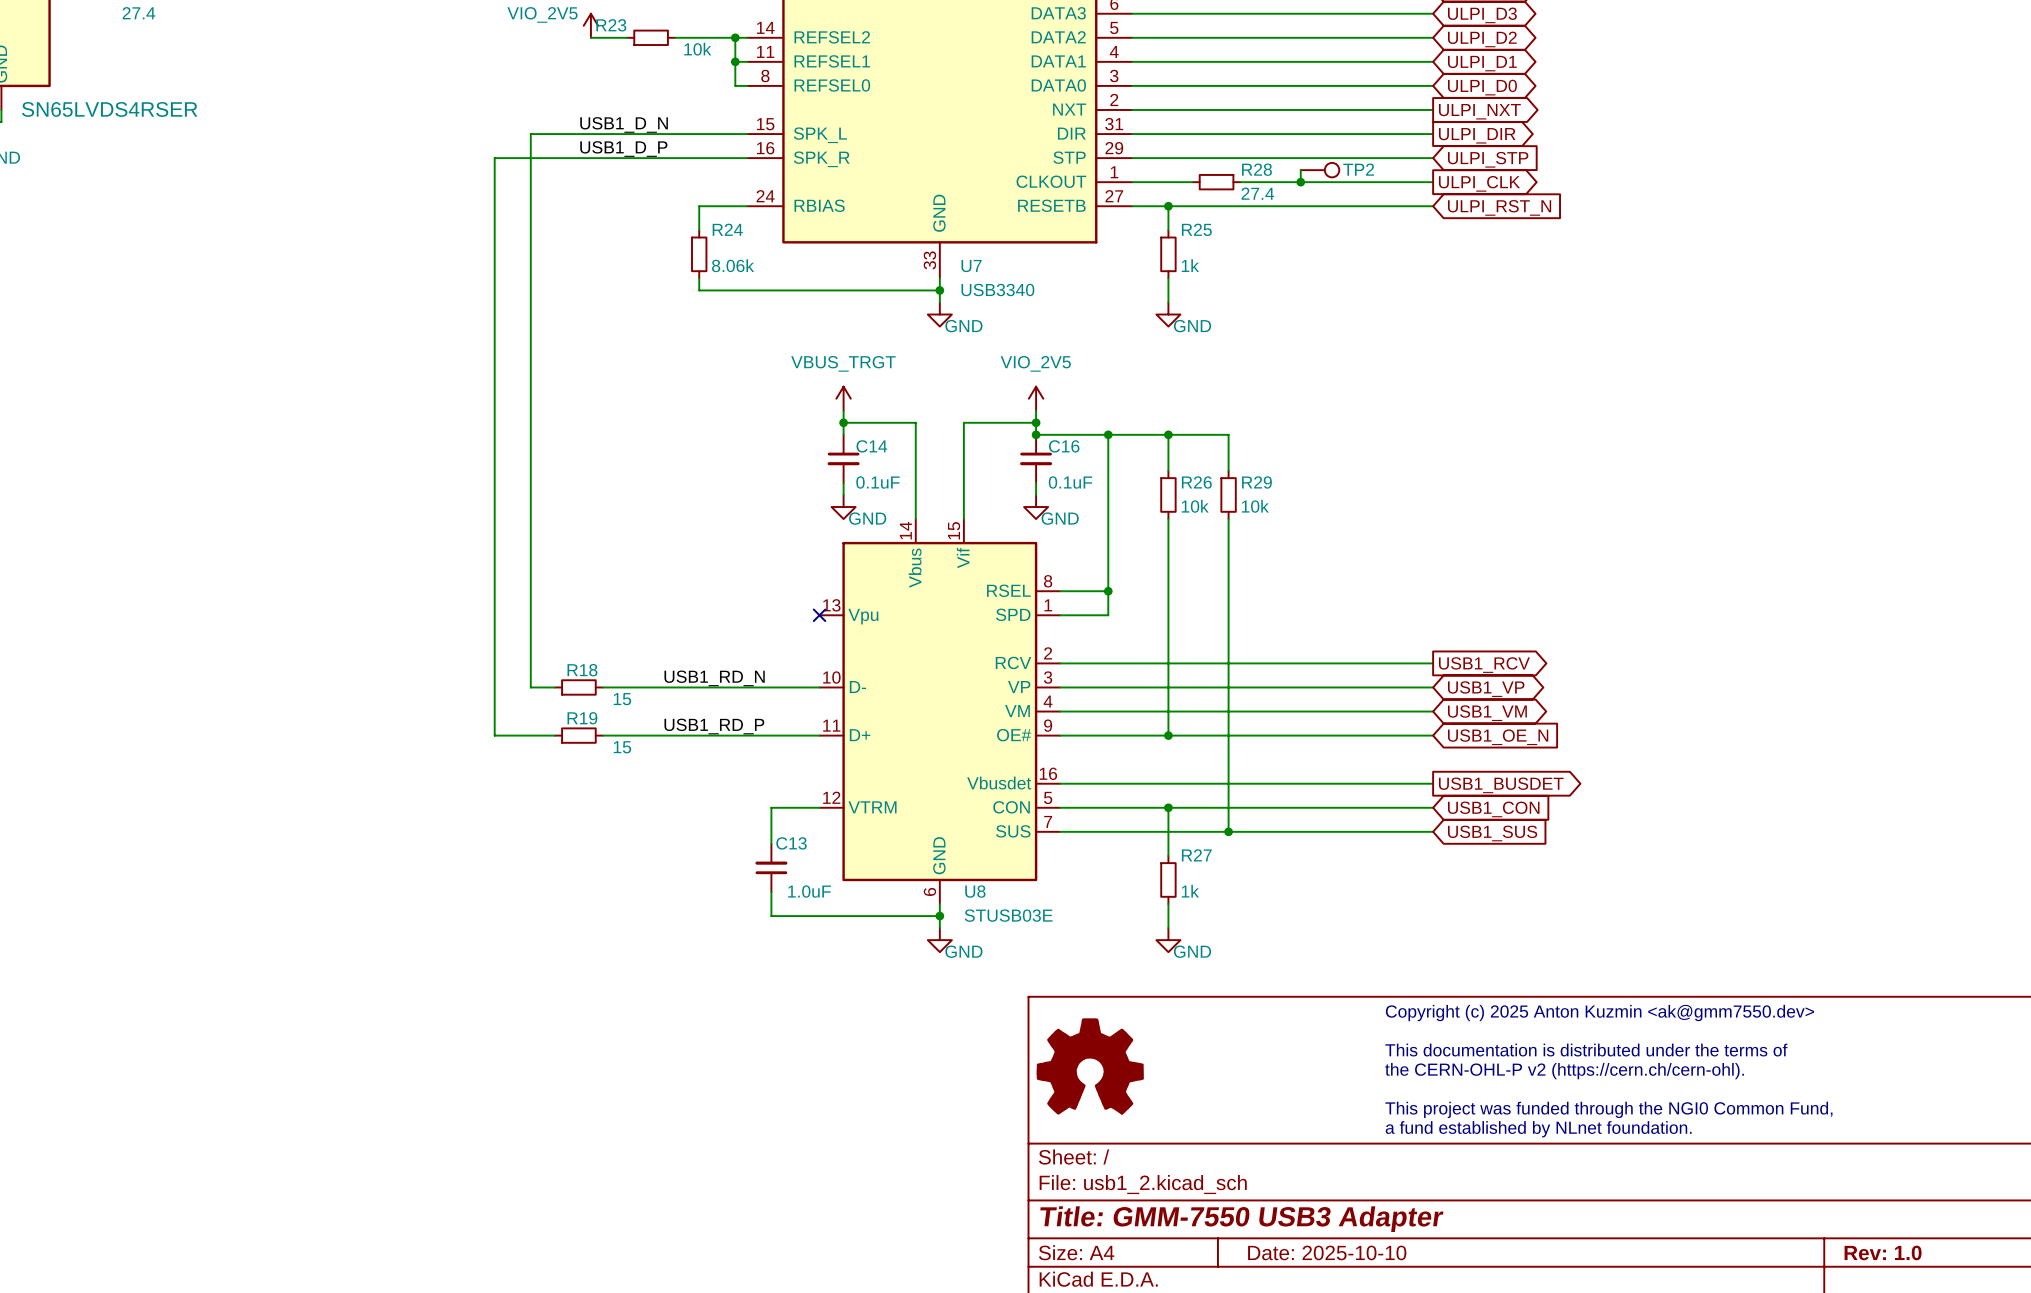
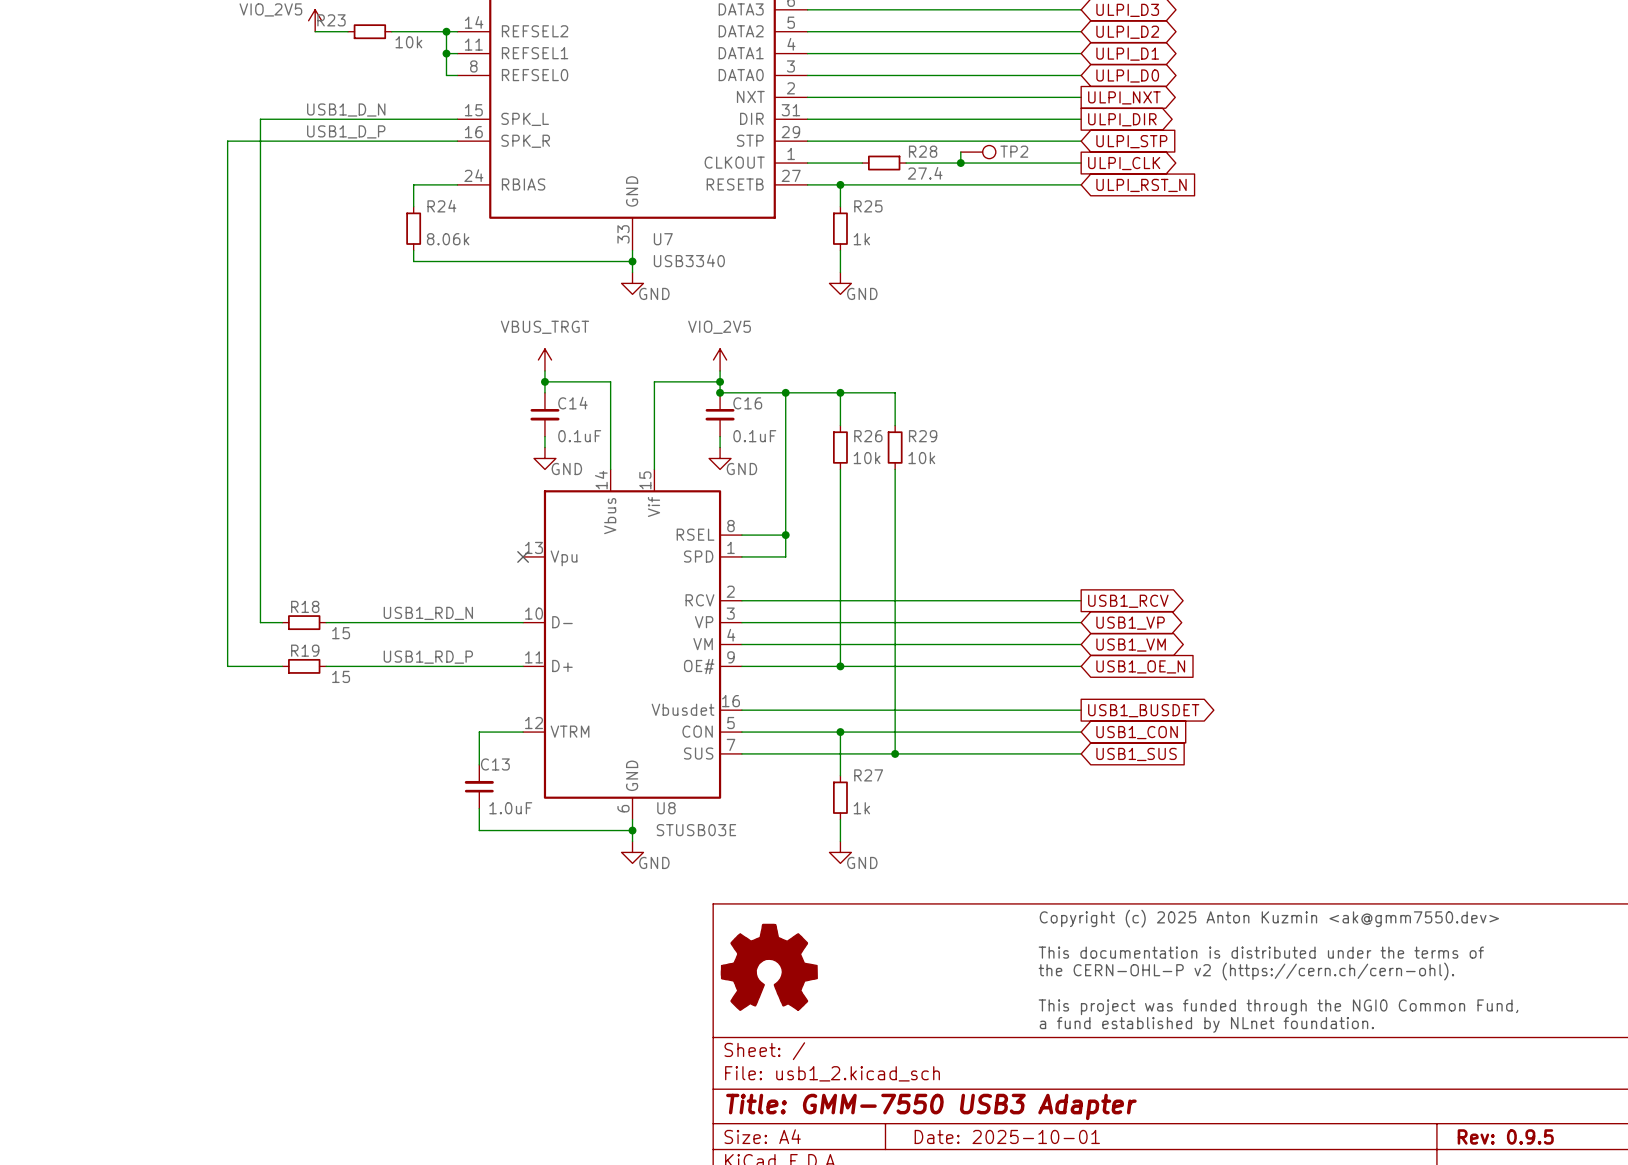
title block: Date: 2025-10-10 (1327, 1252) -> Date: 2025-10-01 (1007, 1136)
title block: Rev: 1.0 (1883, 1252) -> Rev: 0.9.5 (1505, 1136)

